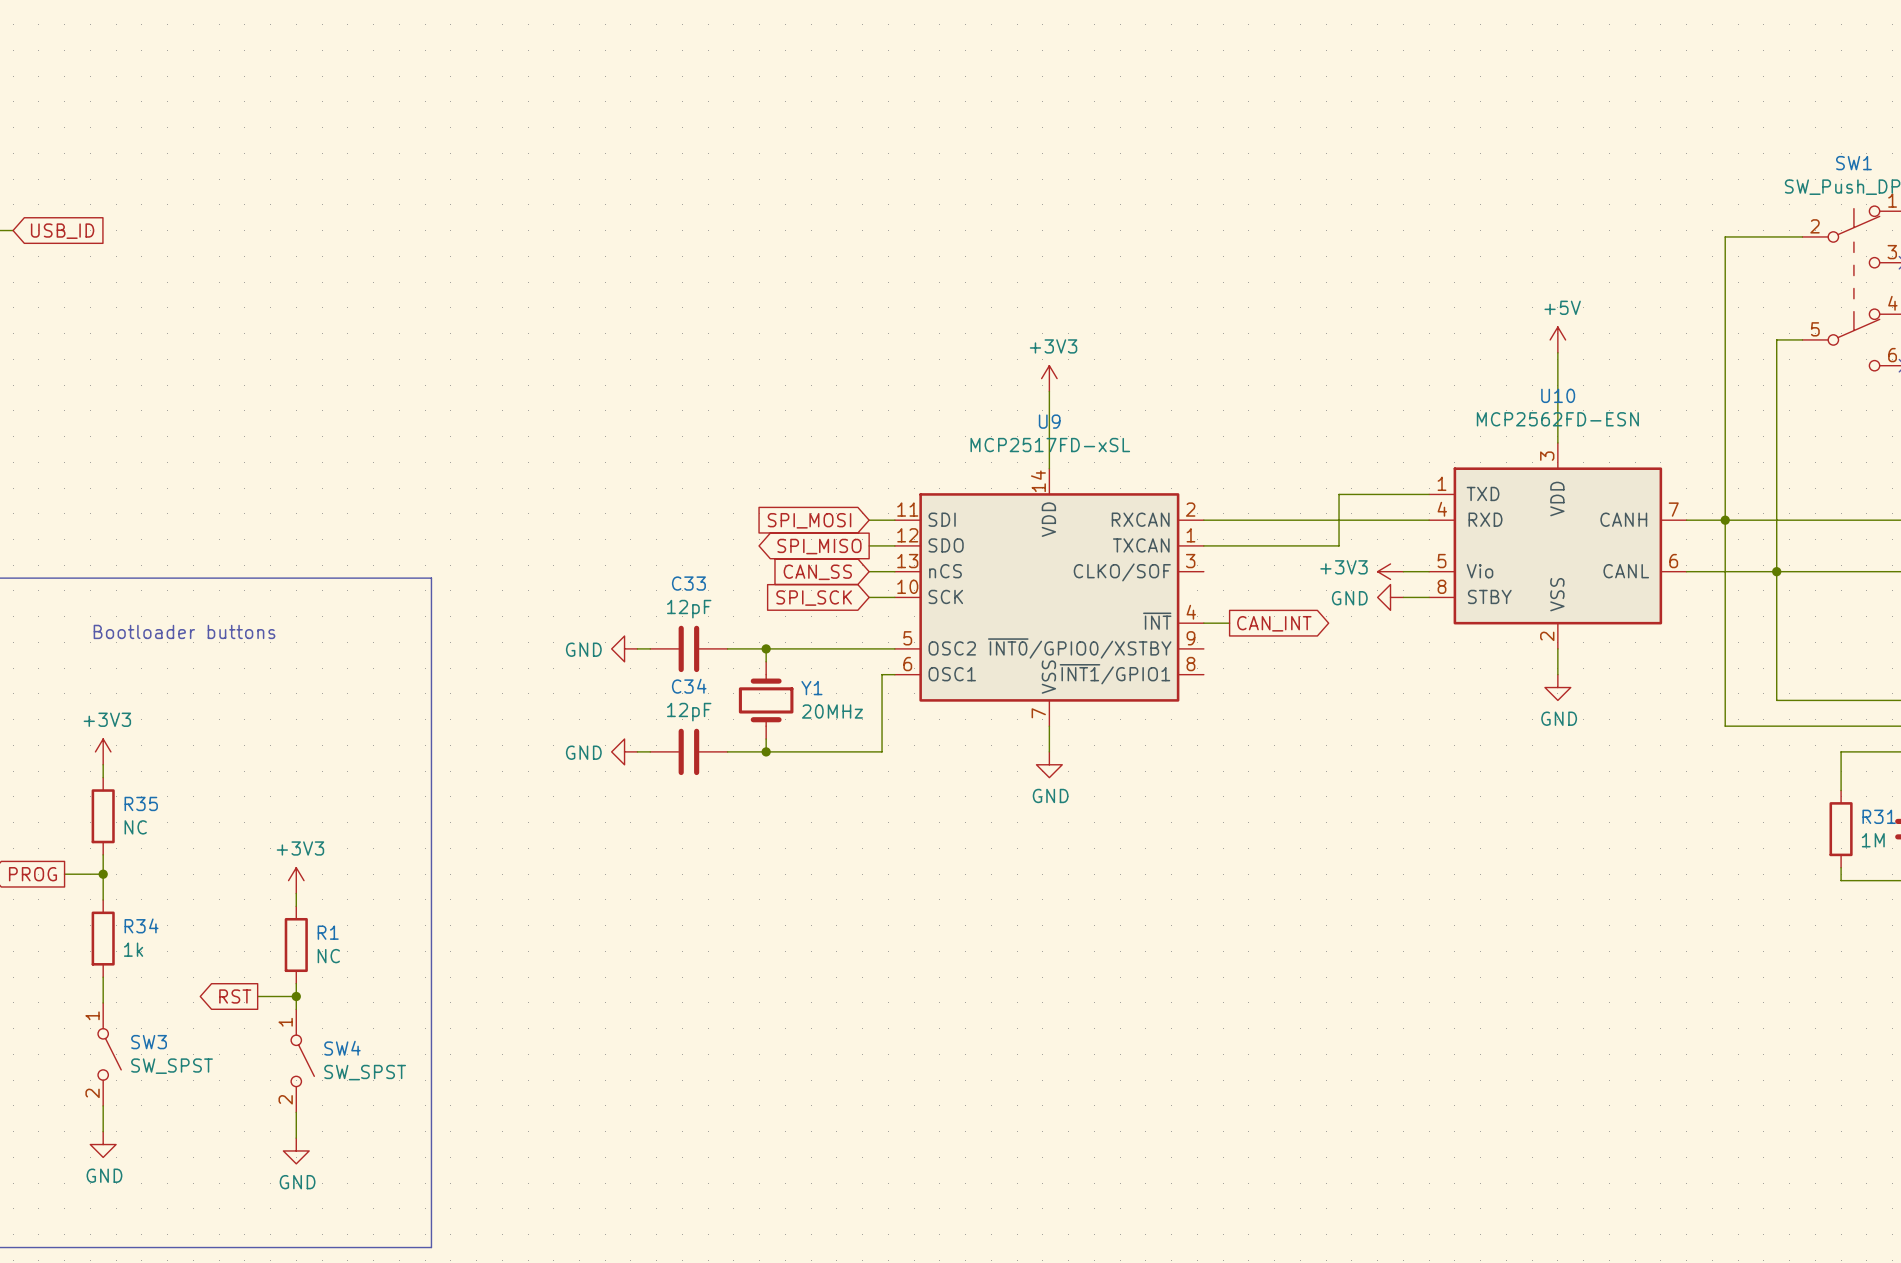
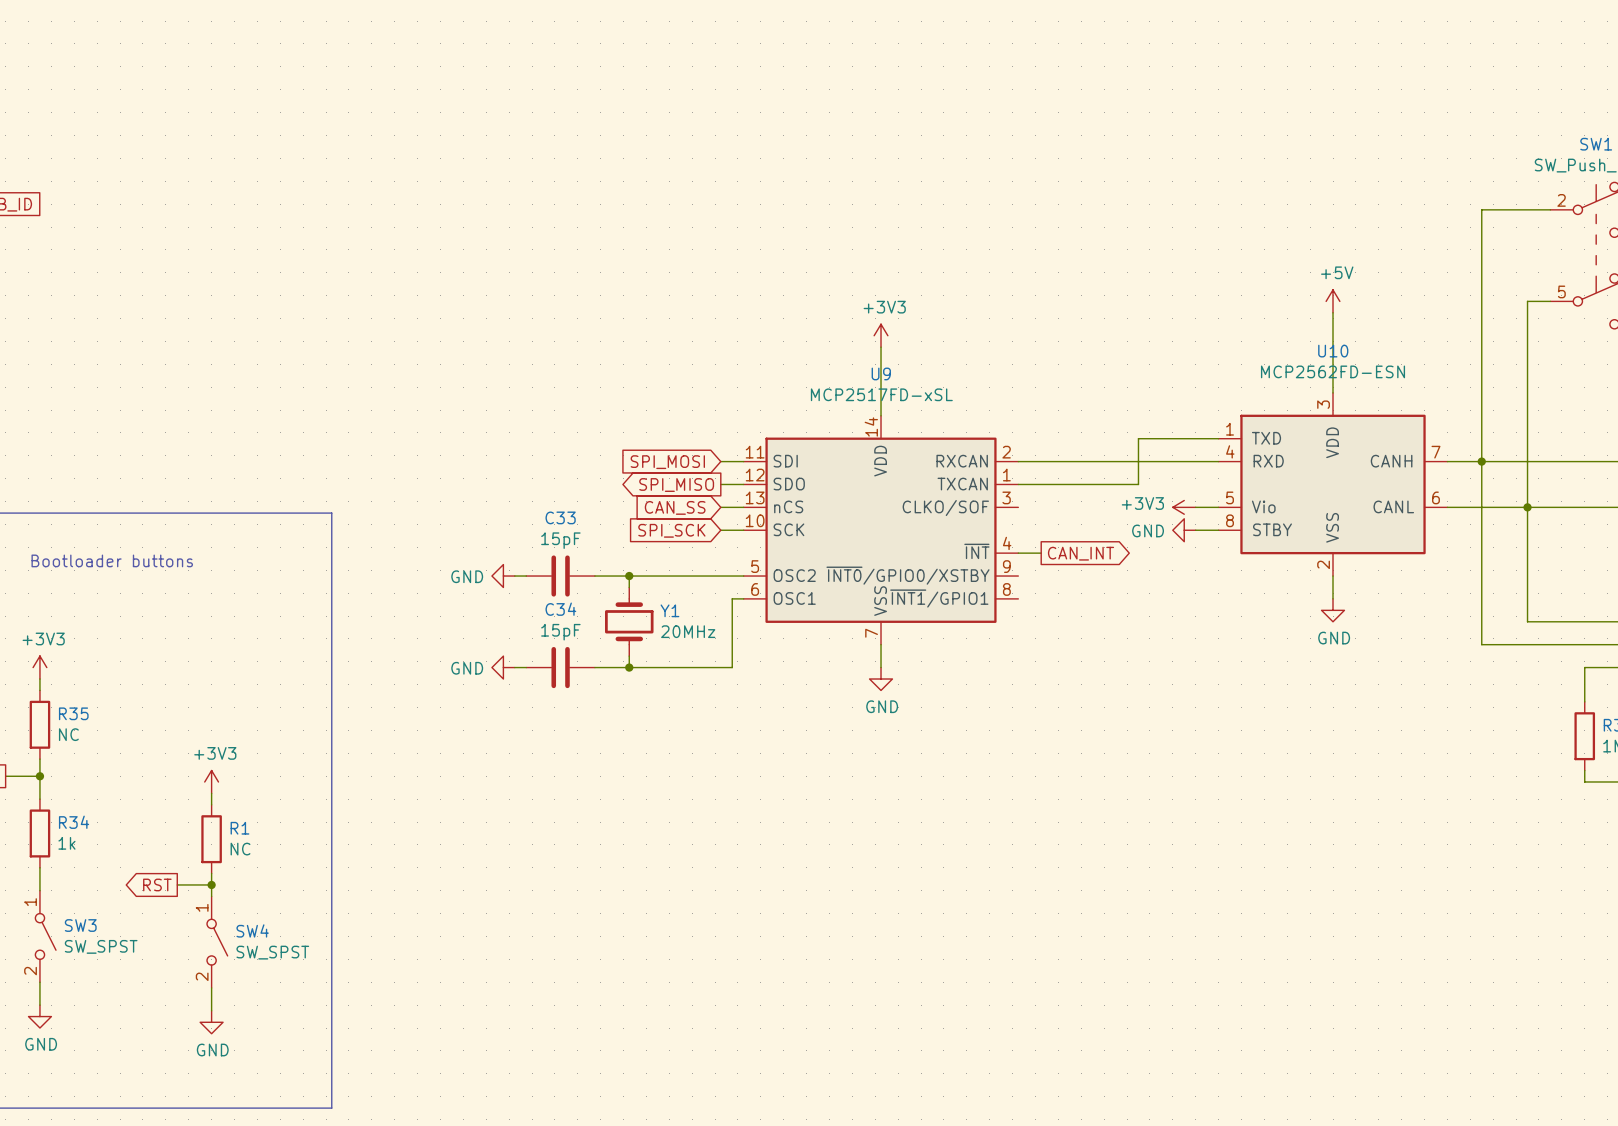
C33 value: 12pF (689, 609) -> 15pF (560, 540)
C34 value: 12pF (689, 712) -> 15pF (560, 632)

